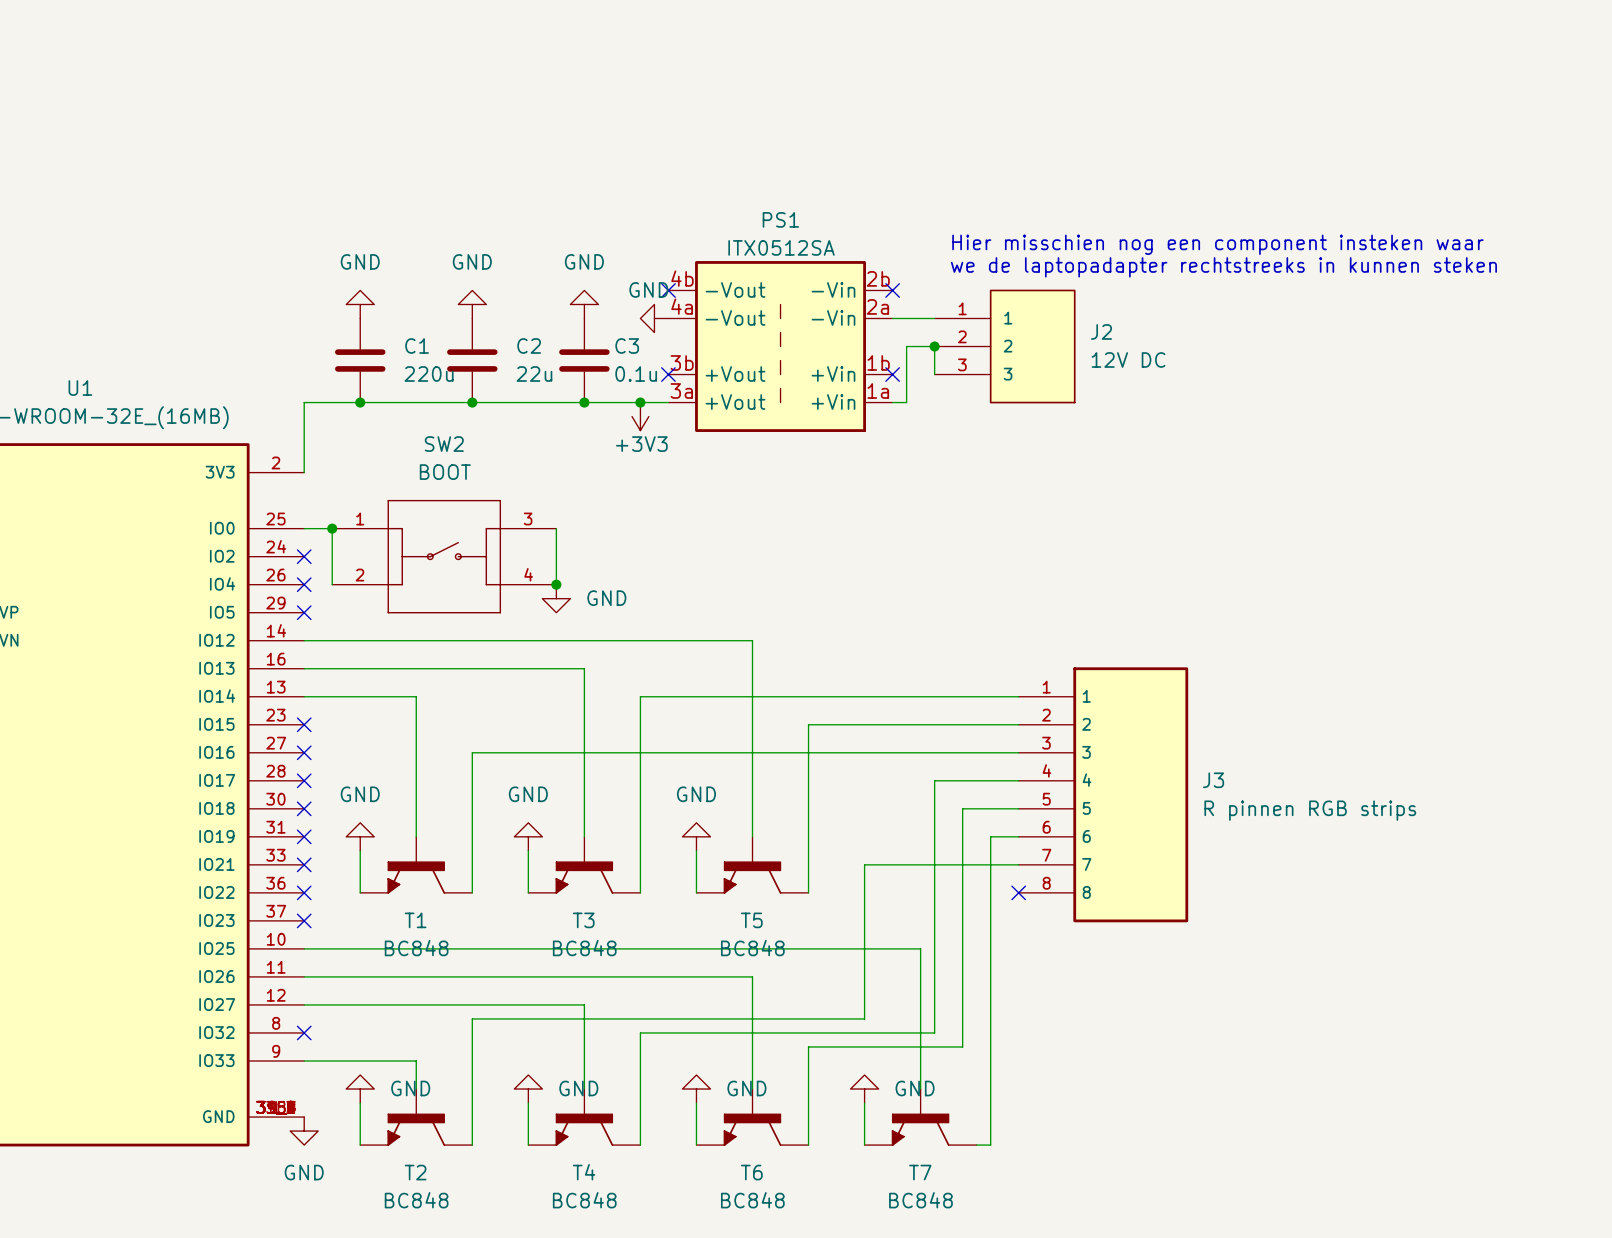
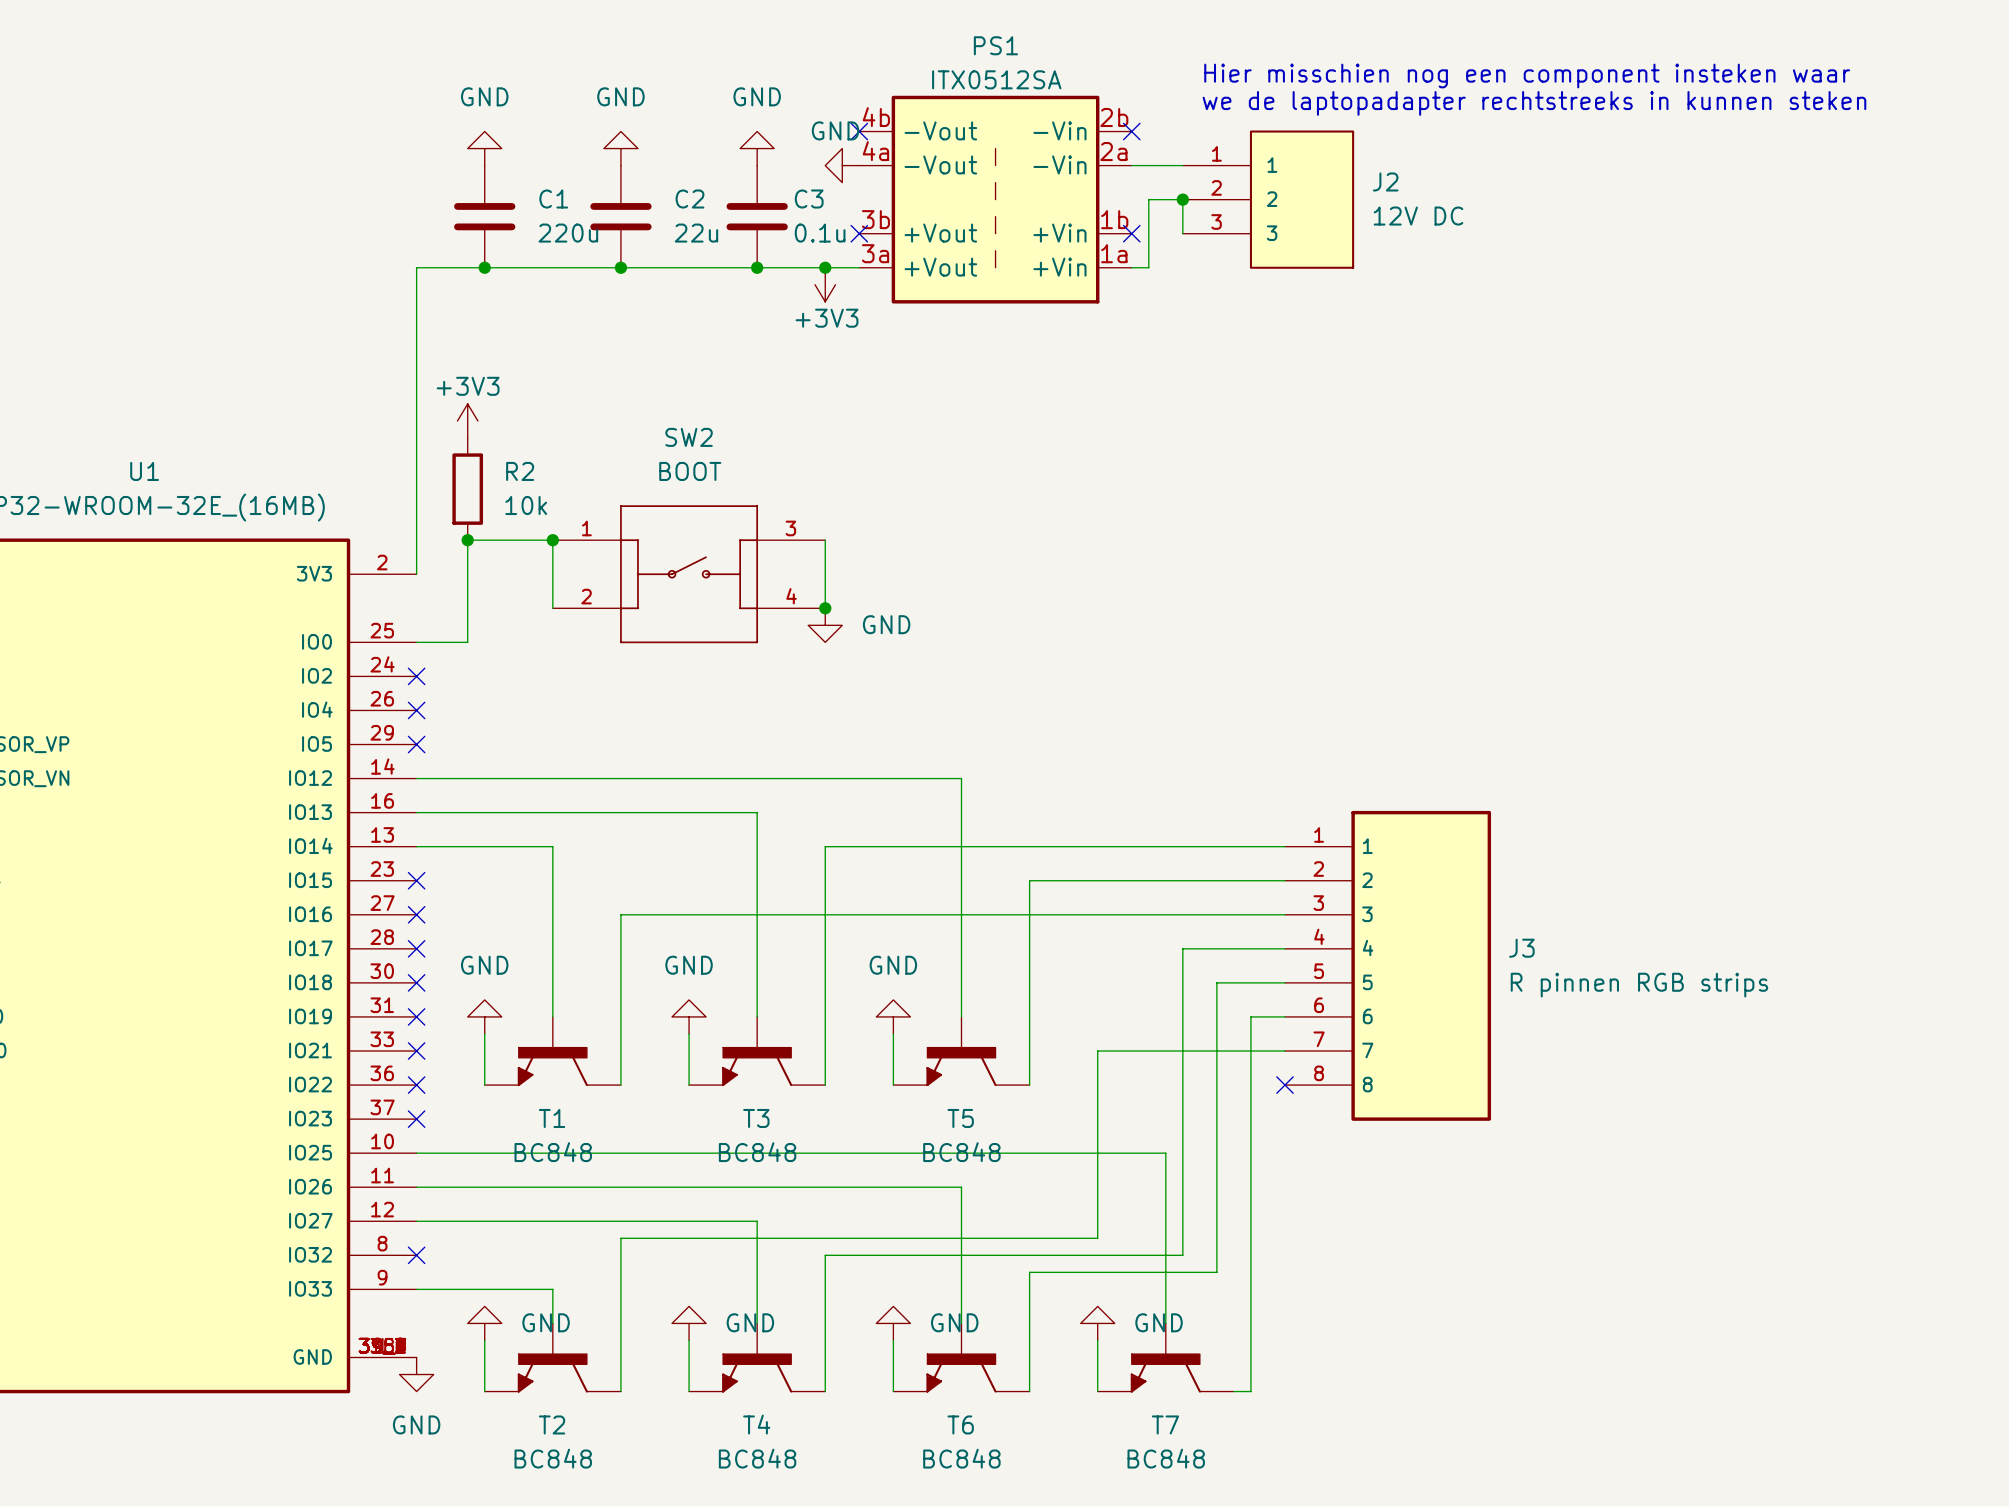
no-connect mark: none -> (859, 131)
no-connect mark: none -> (1131, 131)
power symbol: none -> GND (484, 148)
power symbol: none -> GND (620, 148)
power symbol: none -> GND (757, 148)
power symbol: none -> GND (842, 165)
junction: none -> (1182, 199)
no-connect mark: none -> (859, 233)
no-connect mark: none -> (1131, 233)
junction: none -> (484, 267)
junction: none -> (620, 267)
junction: none -> (757, 267)
junction: none -> (825, 267)
power symbol: none -> +3V3 (825, 284)
text position: Hier misschien nog een component insteken waar (1217, 244) -> Hier misschien nog een component insteken waar (1527, 75)
text position: we de laptopadapter rechtstreeks in kunnen steken (1223, 267) -> we de laptopadapter rechtstreeks in kunnen steken (1534, 103)
no-connect mark: (668, 290) -> none
no-connect mark: (892, 290) -> none
power symbol: GND (360, 304) -> none
power symbol: GND (472, 304) -> none
power symbol: GND (584, 304) -> none
power symbol: GND (654, 318) -> none
wire: (892, 318) (934, 318) -> (1131, 165) (1182, 165)
power symbol: none -> +3V3 (467, 421)
PS1 position: (780, 346) -> (995, 199)
junction: (934, 346) -> none
J2 position: (1005, 346) -> (1268, 199)
C1 position: (360, 360) -> (484, 216)
C2 position: (472, 360) -> (620, 216)
C3 position: (584, 360) -> (757, 216)
no-connect mark: (668, 374) -> none
no-connect mark: (892, 374) -> none
wire: (934, 374) (934, 346) (906, 346) (906, 402) (892, 402) -> (1182, 233) (1182, 199) (1148, 199) (1148, 267) (1131, 267)
wire: (304, 402) (668, 402) -> (416, 489) (416, 267) (859, 267)
R2: none -> 10k (467, 489)
junction: (360, 402) -> none
junction: (472, 402) -> none
junction: (584, 402) -> none
junction: (640, 402) -> none
power symbol: +3V3 (640, 416) -> none
junction: none -> (467, 540)
junction: none -> (552, 540)
junction: none -> (825, 608)
power symbol: none -> GND (825, 625)
wire: (332, 528) (332, 584) -> (450, 642) (467, 642) (467, 540) (552, 540) (552, 608)
junction: (332, 528) -> none
wire: (556, 528) (556, 584) -> (825, 540) (825, 608)
SW2 position: (444, 556) -> (689, 574)
junction: (556, 584) -> none
power symbol: GND (556, 598) -> none

